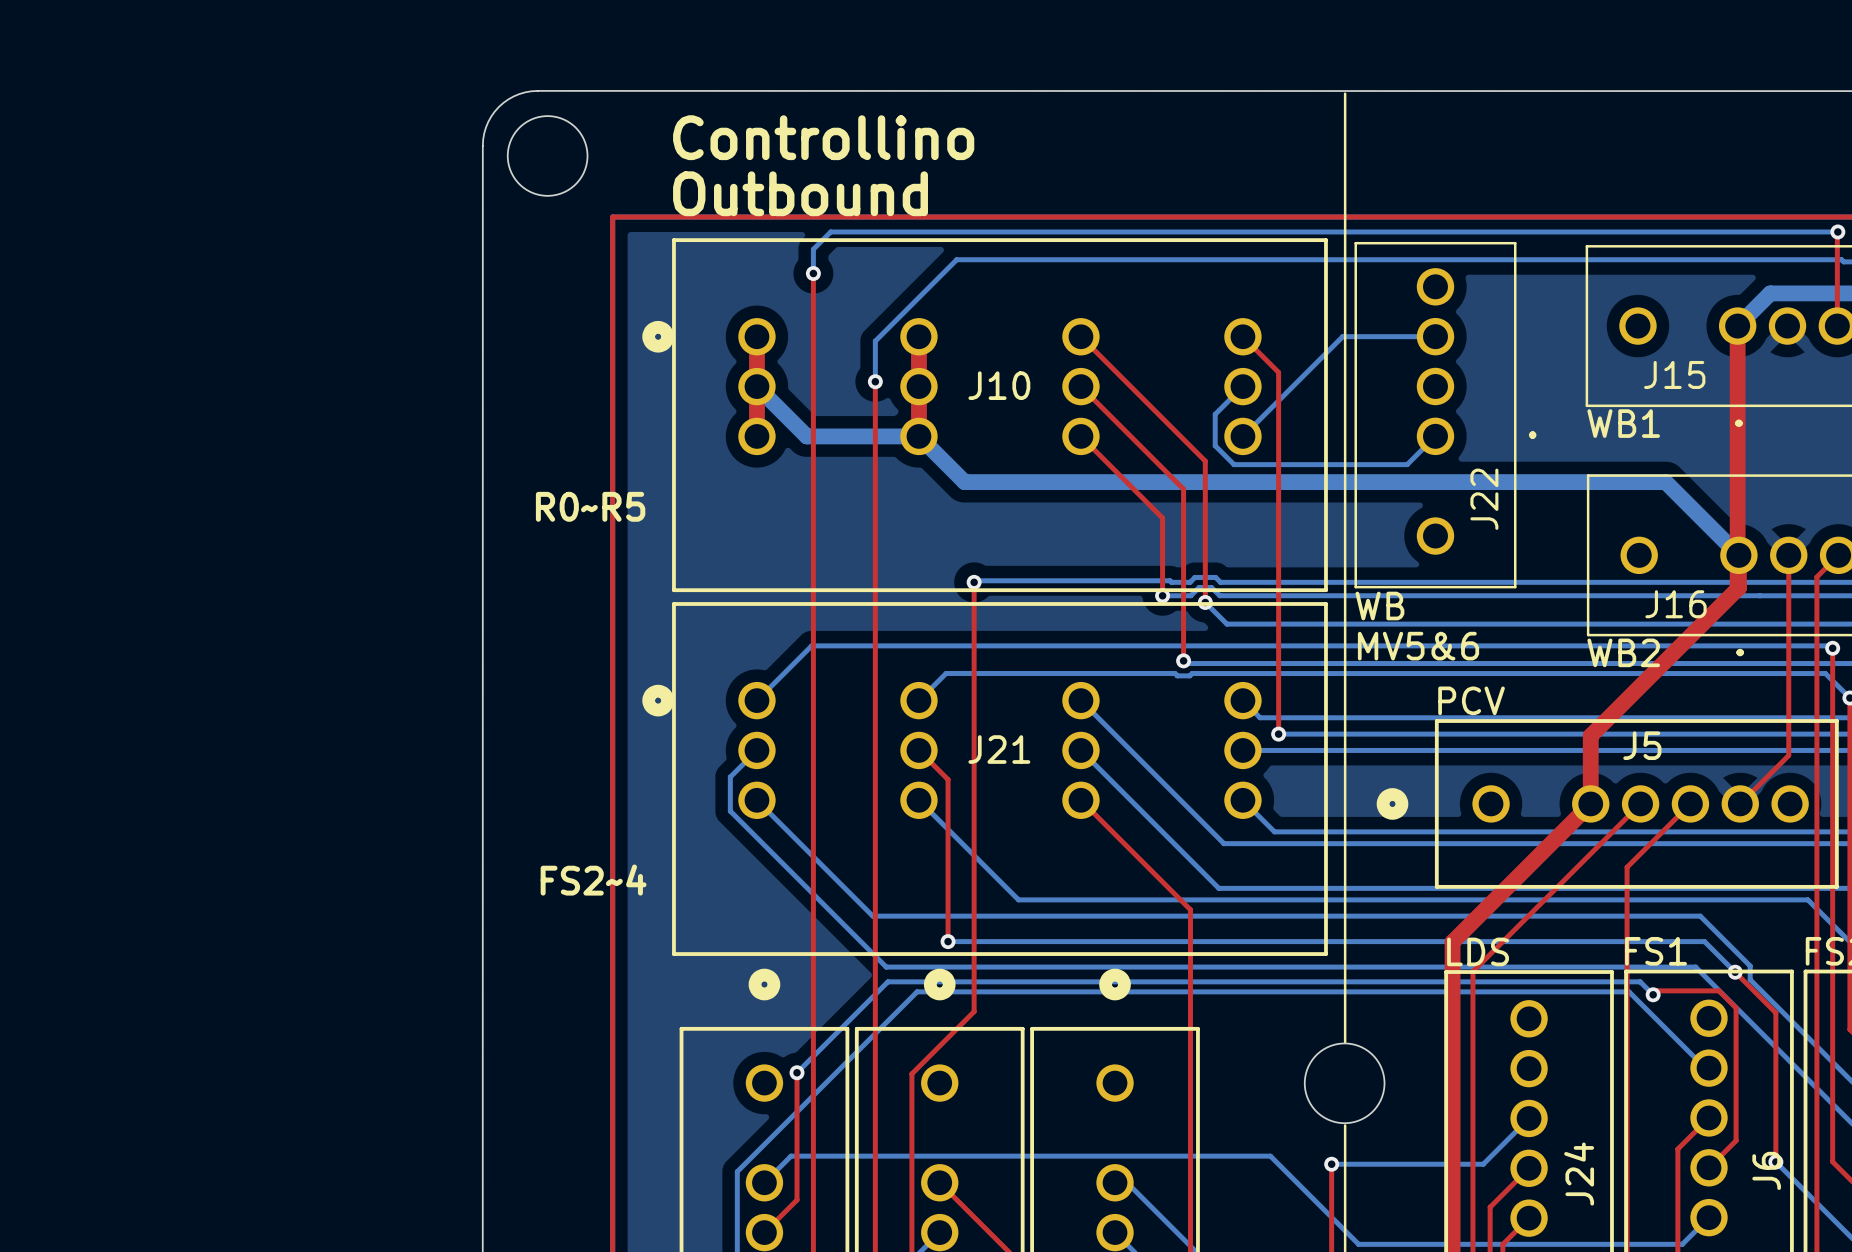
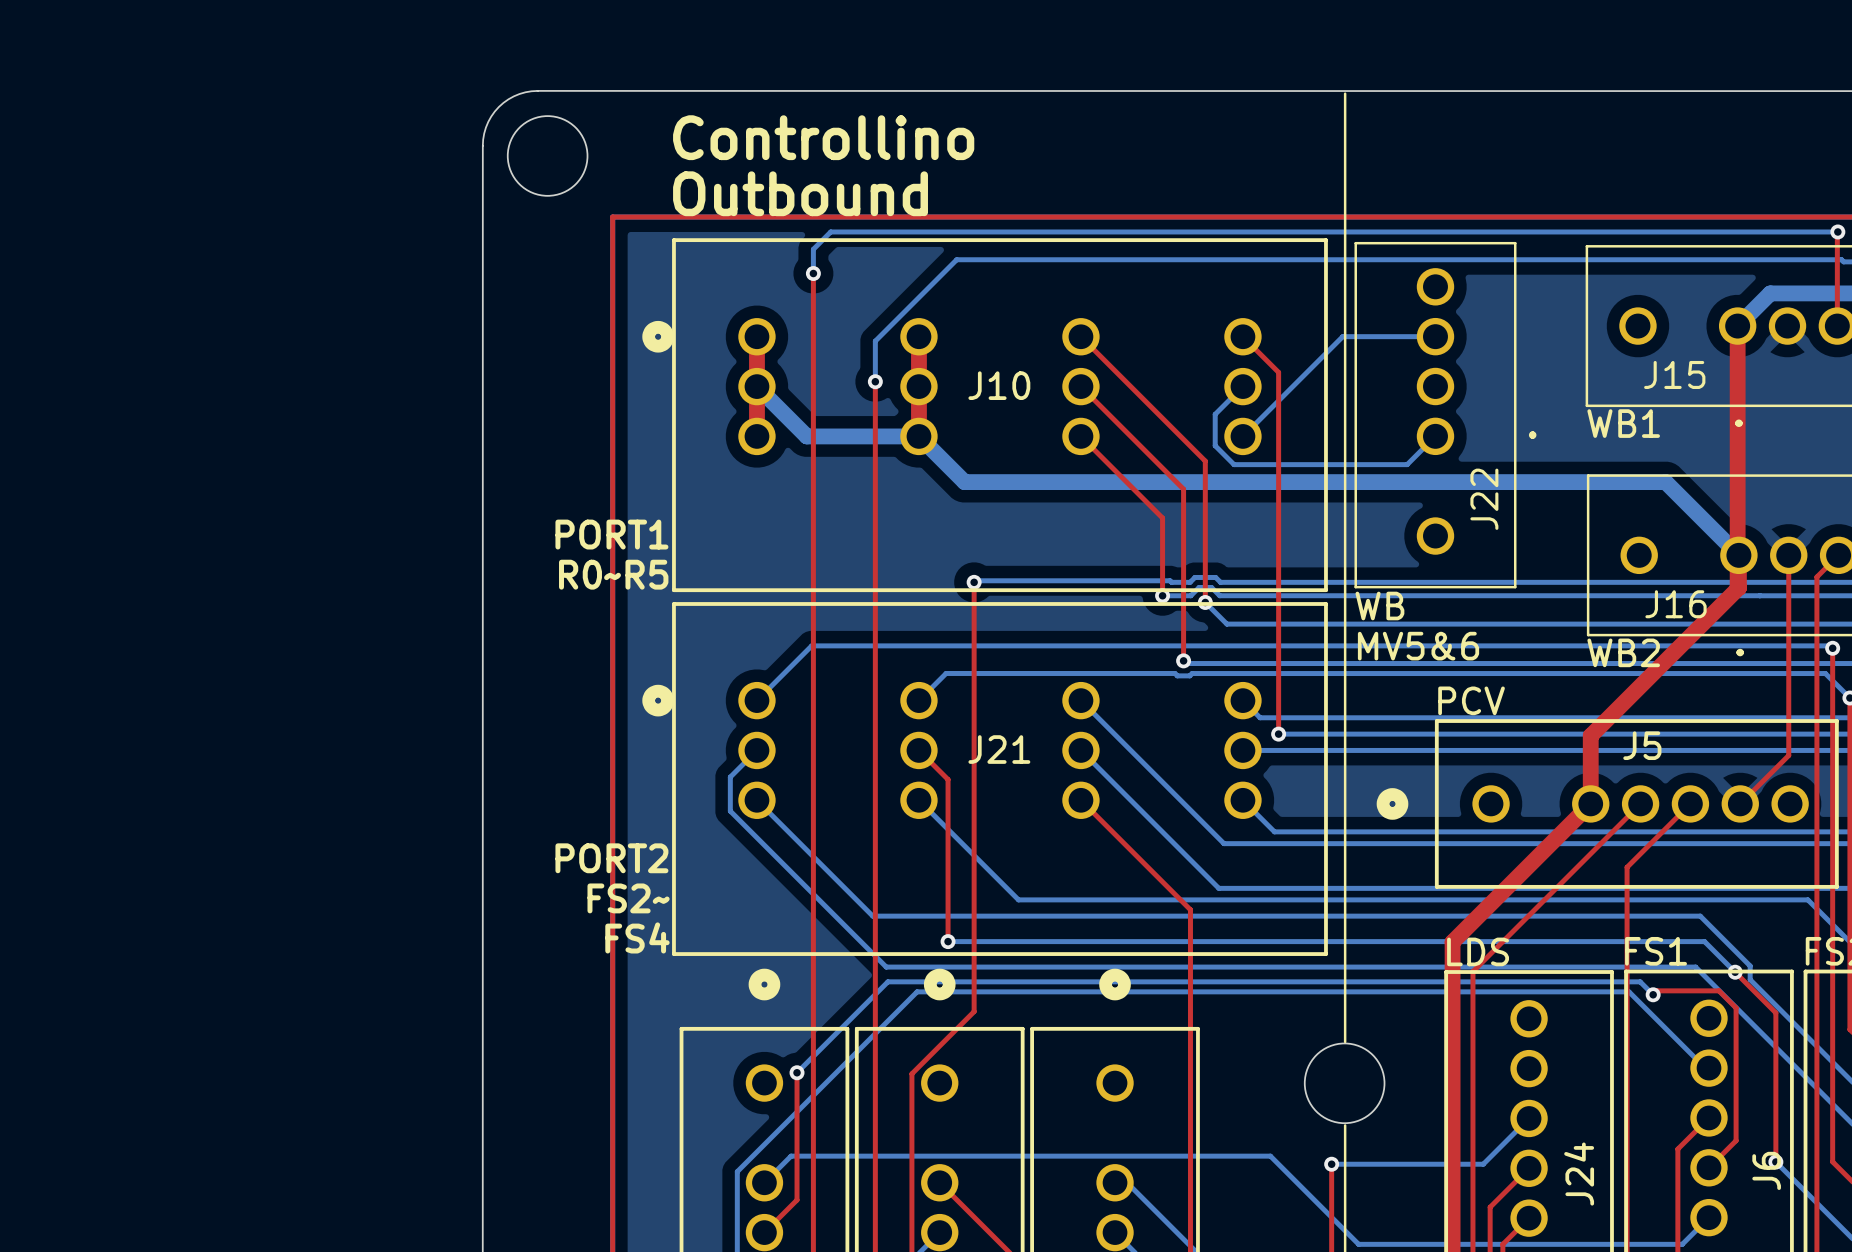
text position: R0~R5 (590, 506) -> R0~R5 (613, 574)
text: none -> PORT1 (611, 534)
text: none -> PORT2 (611, 858)
text: FS2~4 (593, 880) -> FS2~ (628, 898)
text: none -> FS4 (637, 937)

